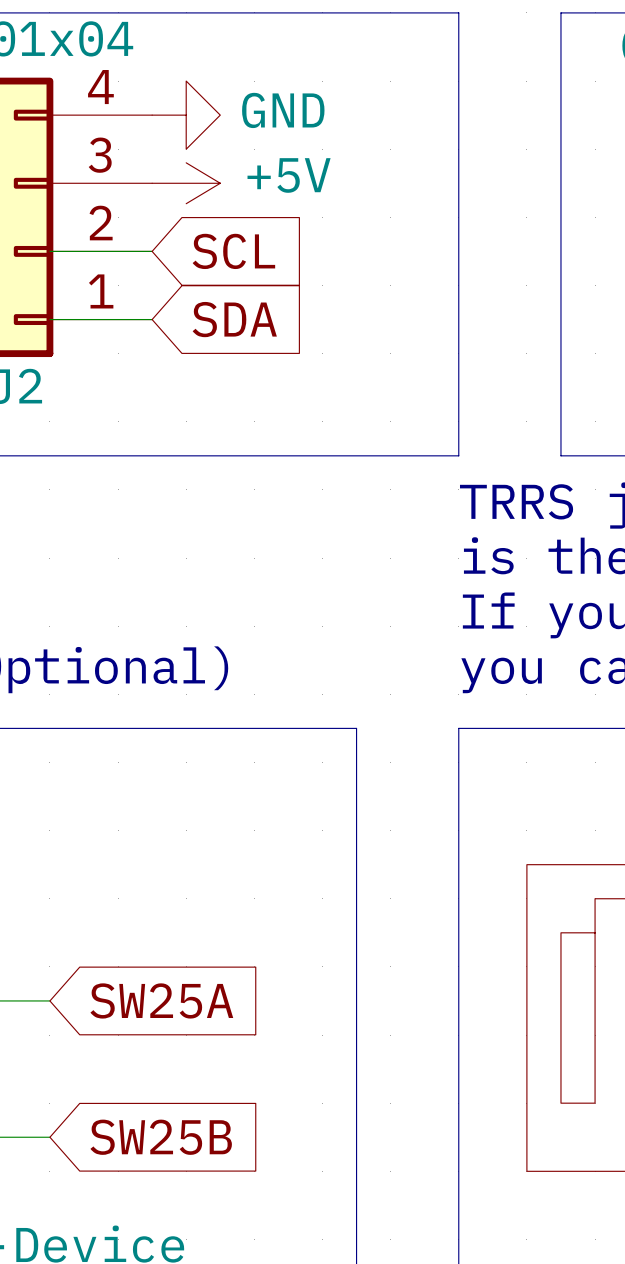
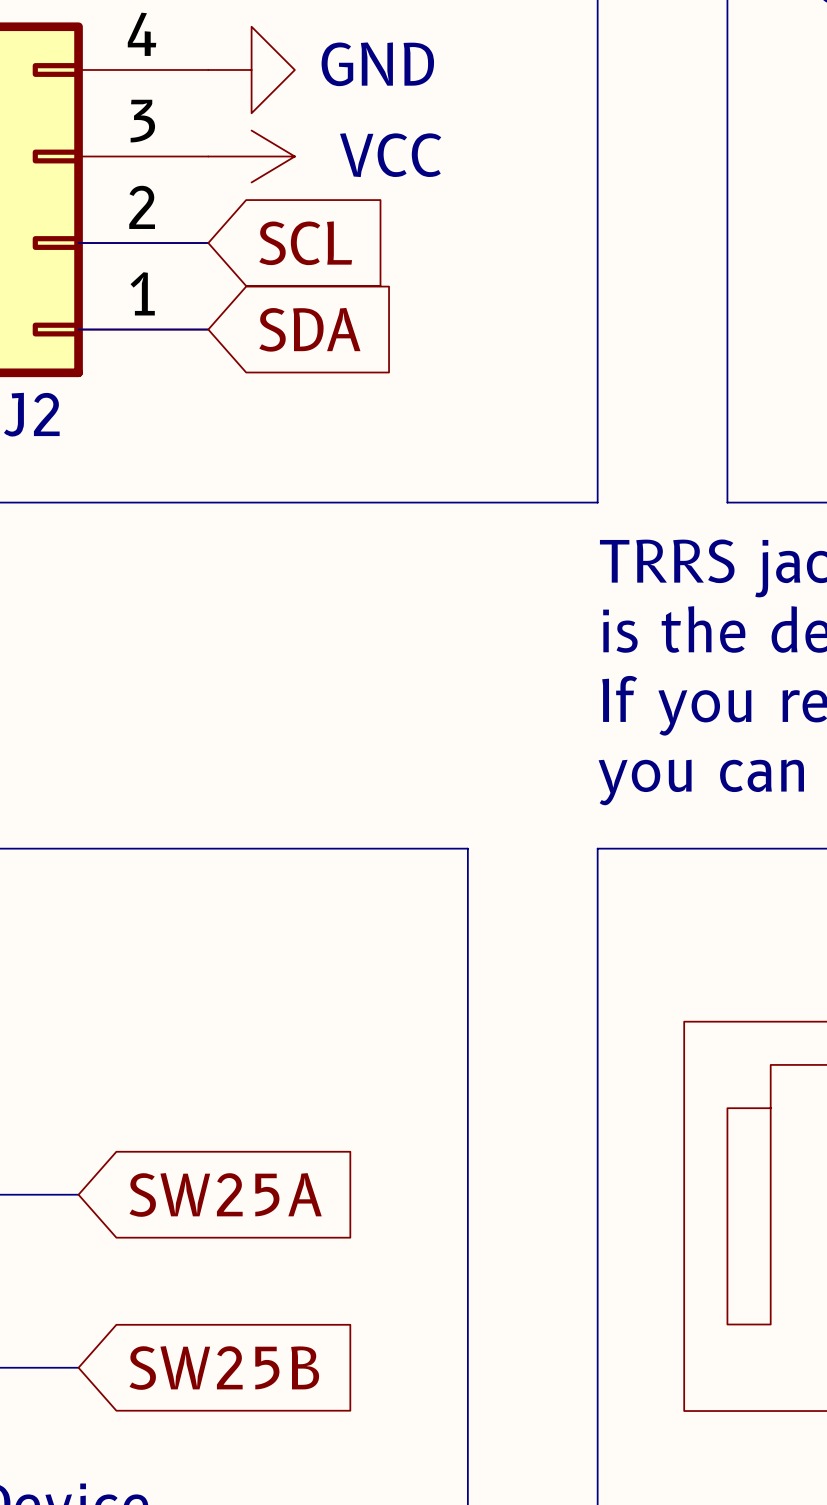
power symbol: +5V (186, 183) -> VCC (251, 156)

